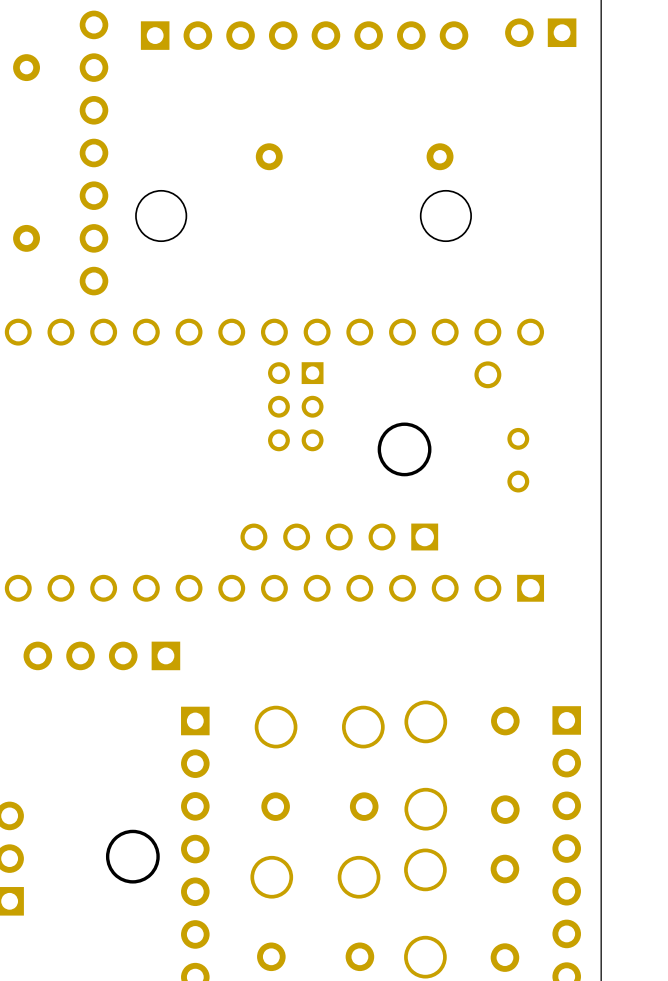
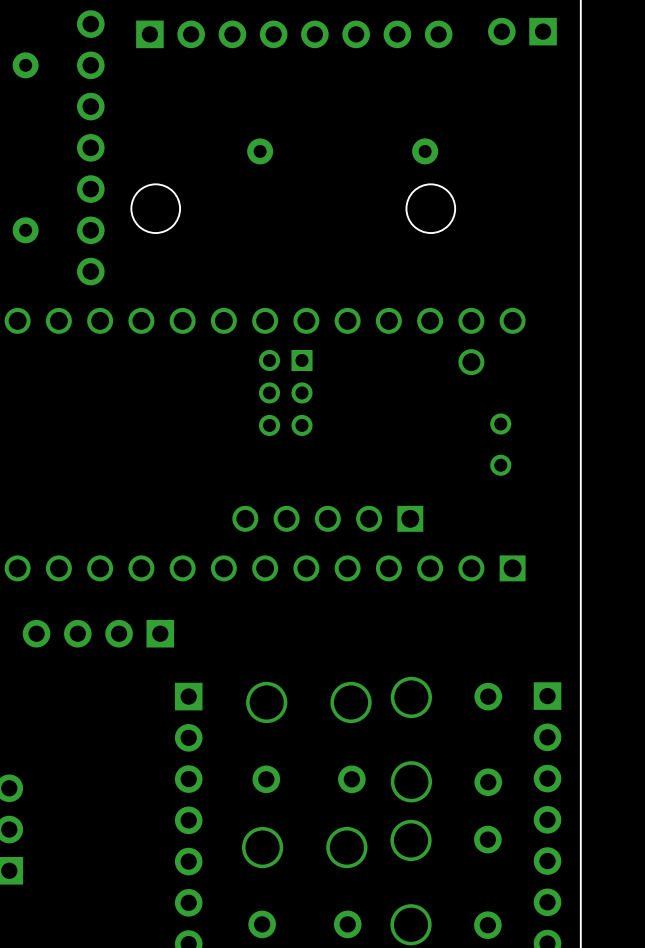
round board edge: [377, 422, 432, 477] -> none
round board edge: [105, 829, 160, 884] -> none

